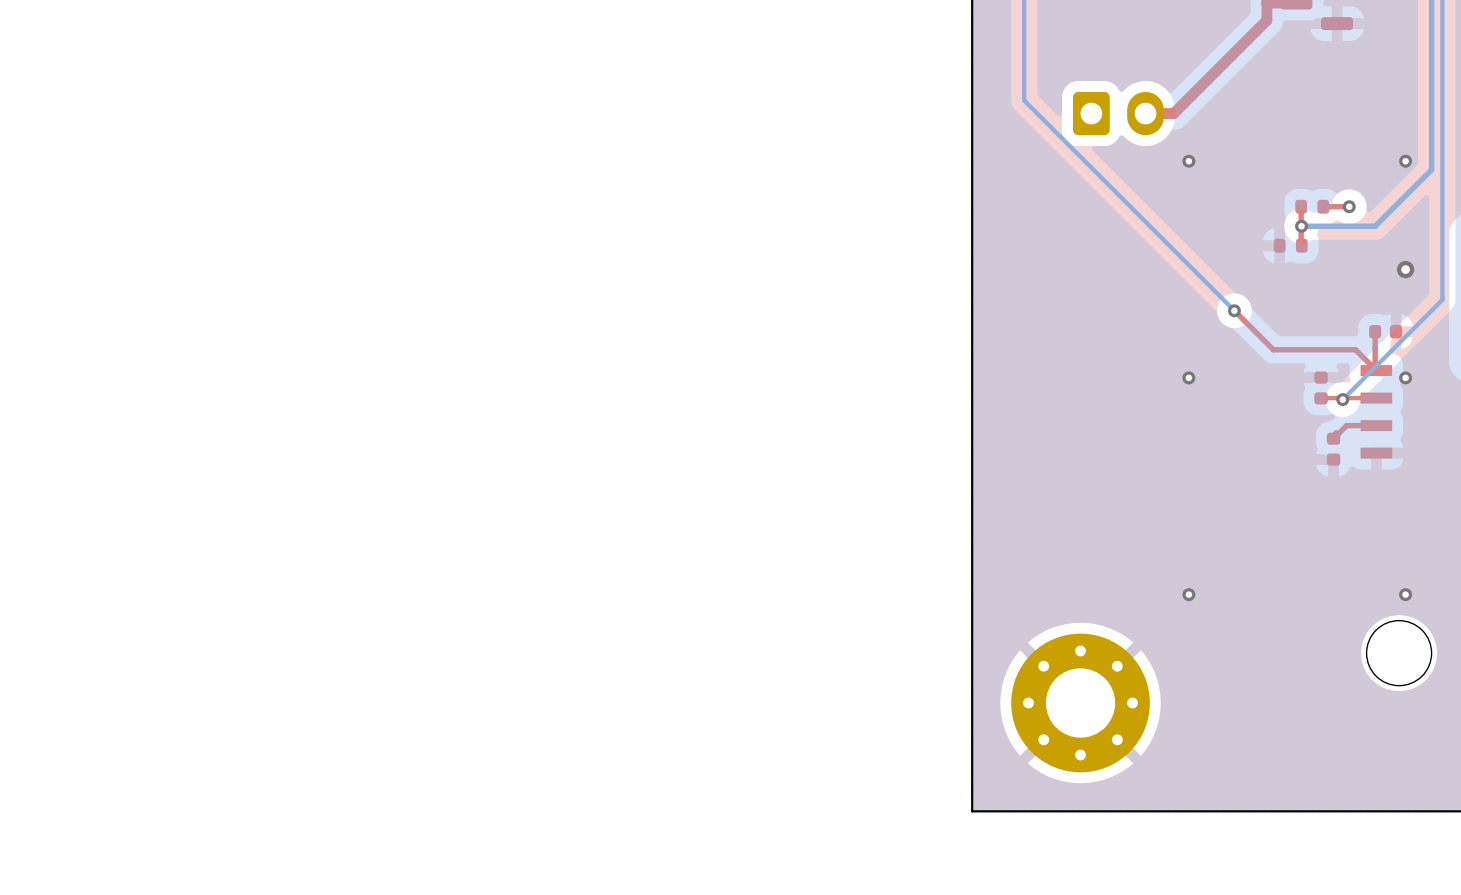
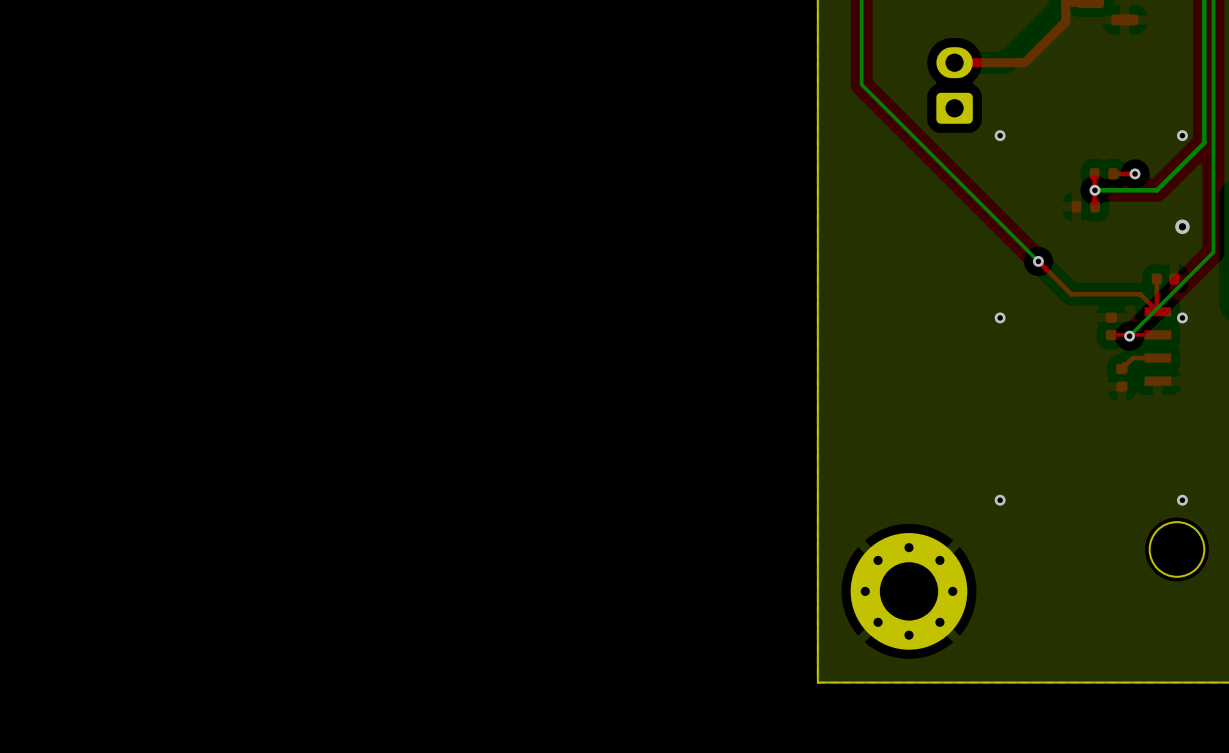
top track: (1266, 20) (1173, 113) (1145, 113) -> (1065, 17) (1065, 21) (1024, 62) (954, 62)
part rotation: 0° (1118, 113) -> 90° counterclockwise (954, 85)

